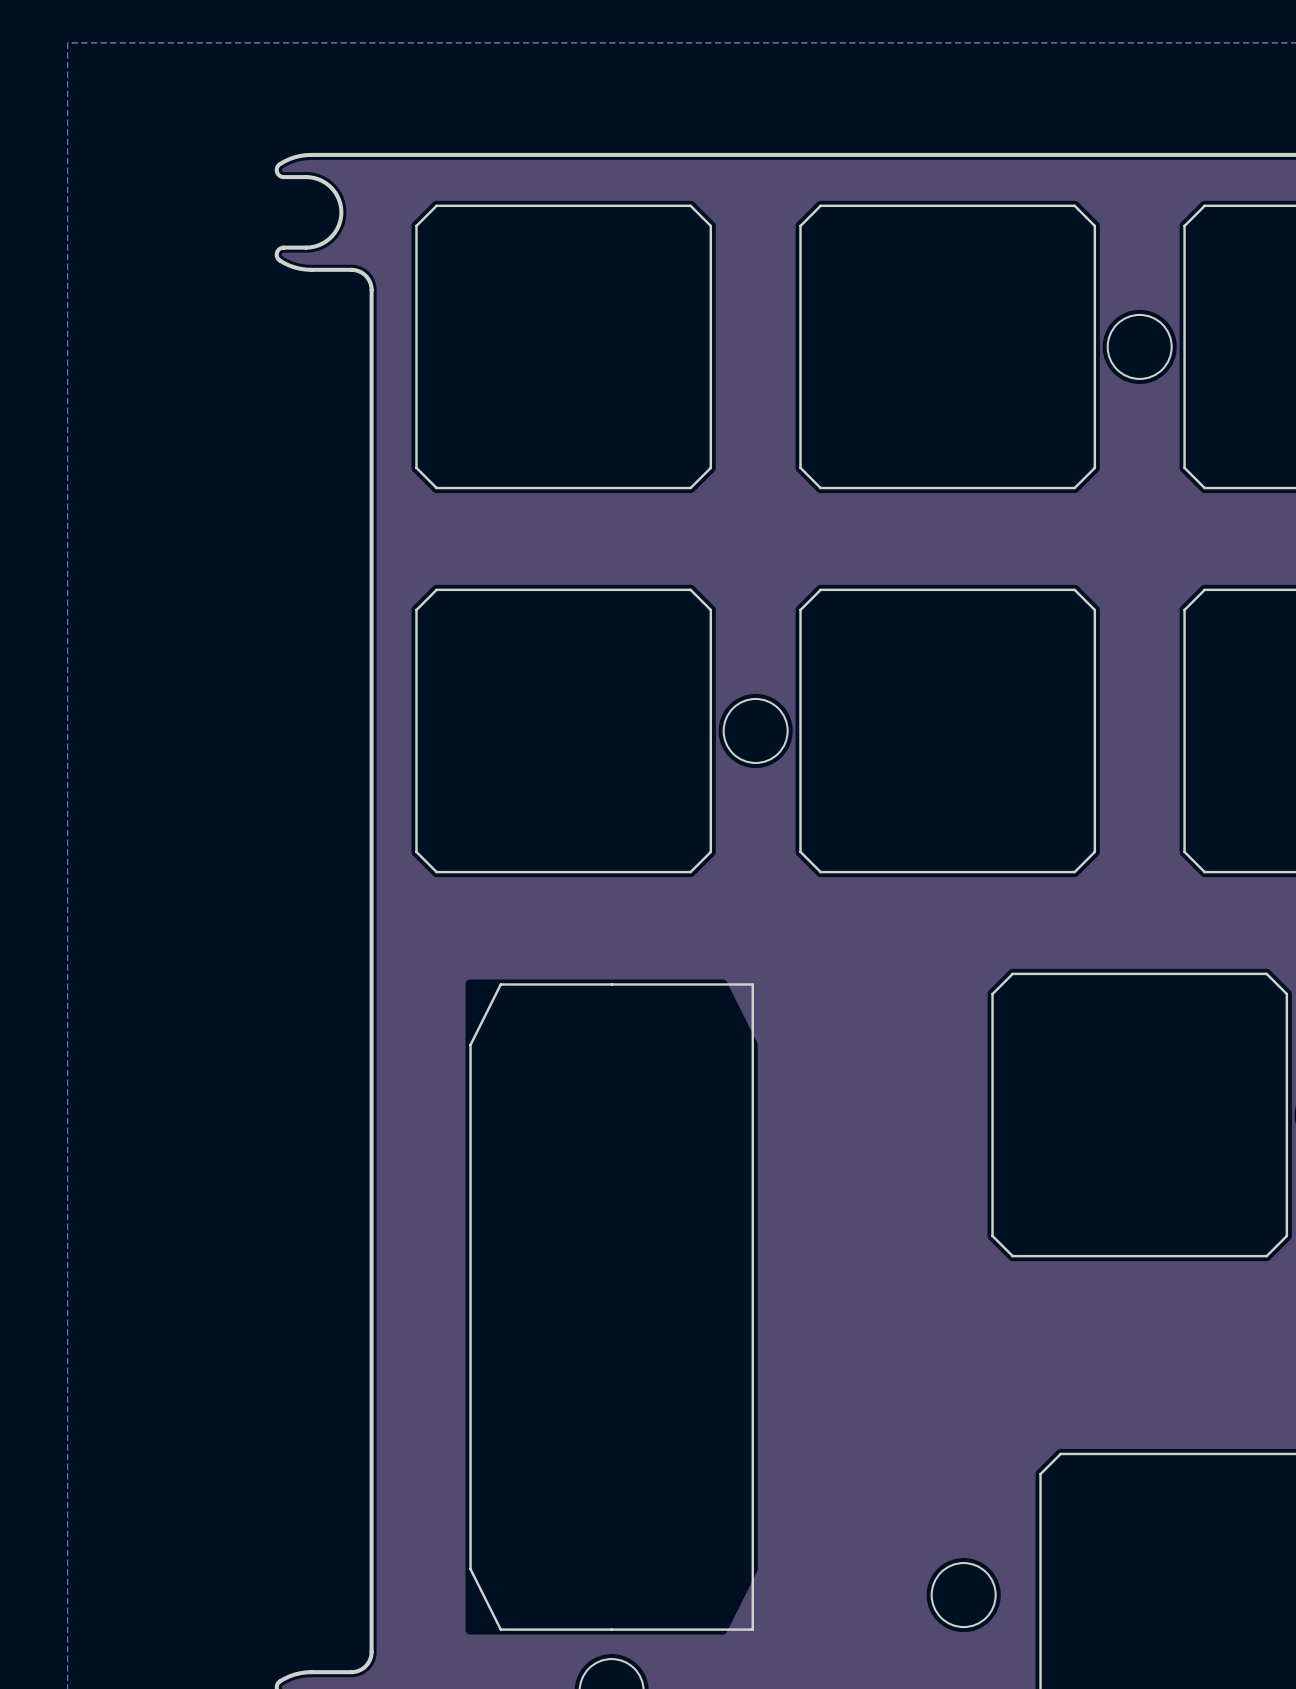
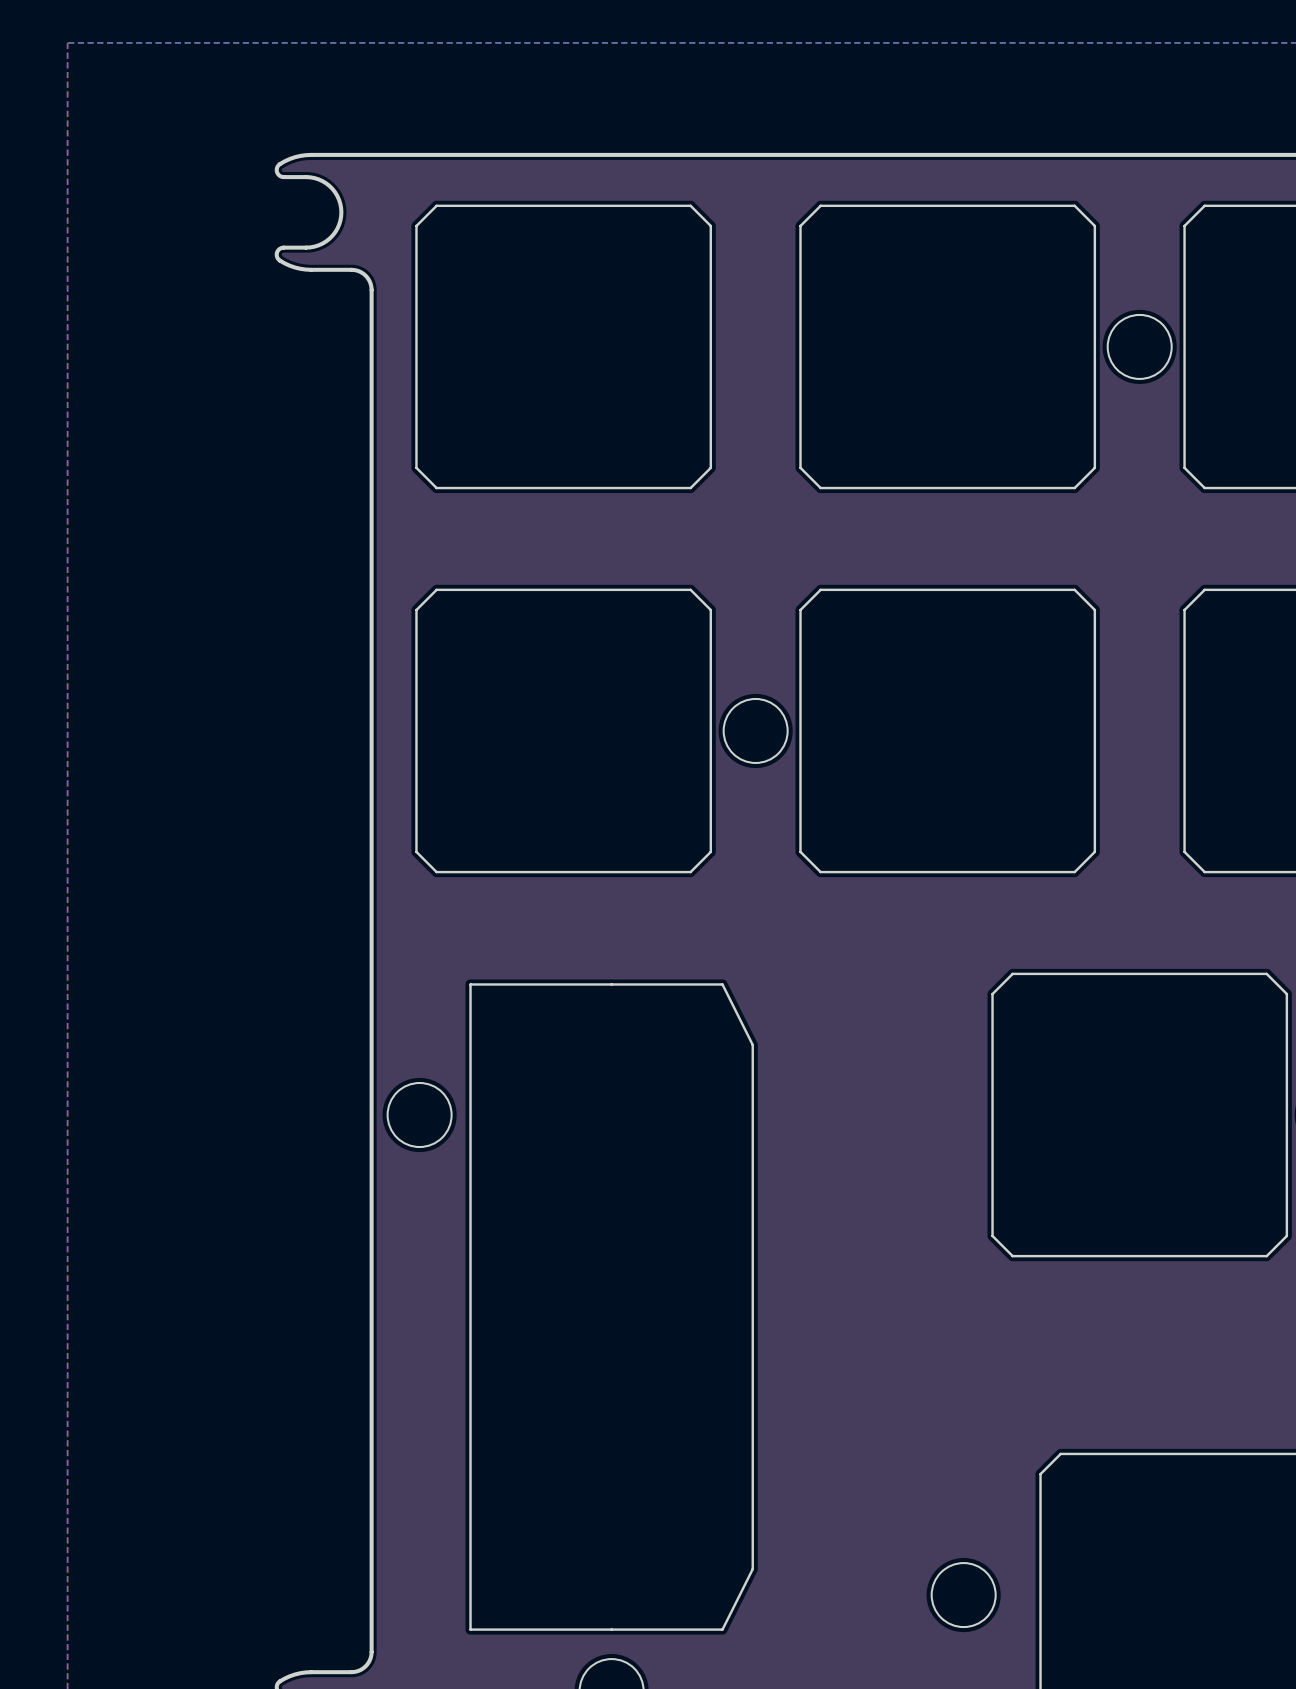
drawing shape: [469, 983, 754, 1631] -> [469, 983, 754, 1631]
round board edge: none -> [386, 1082, 453, 1149]

